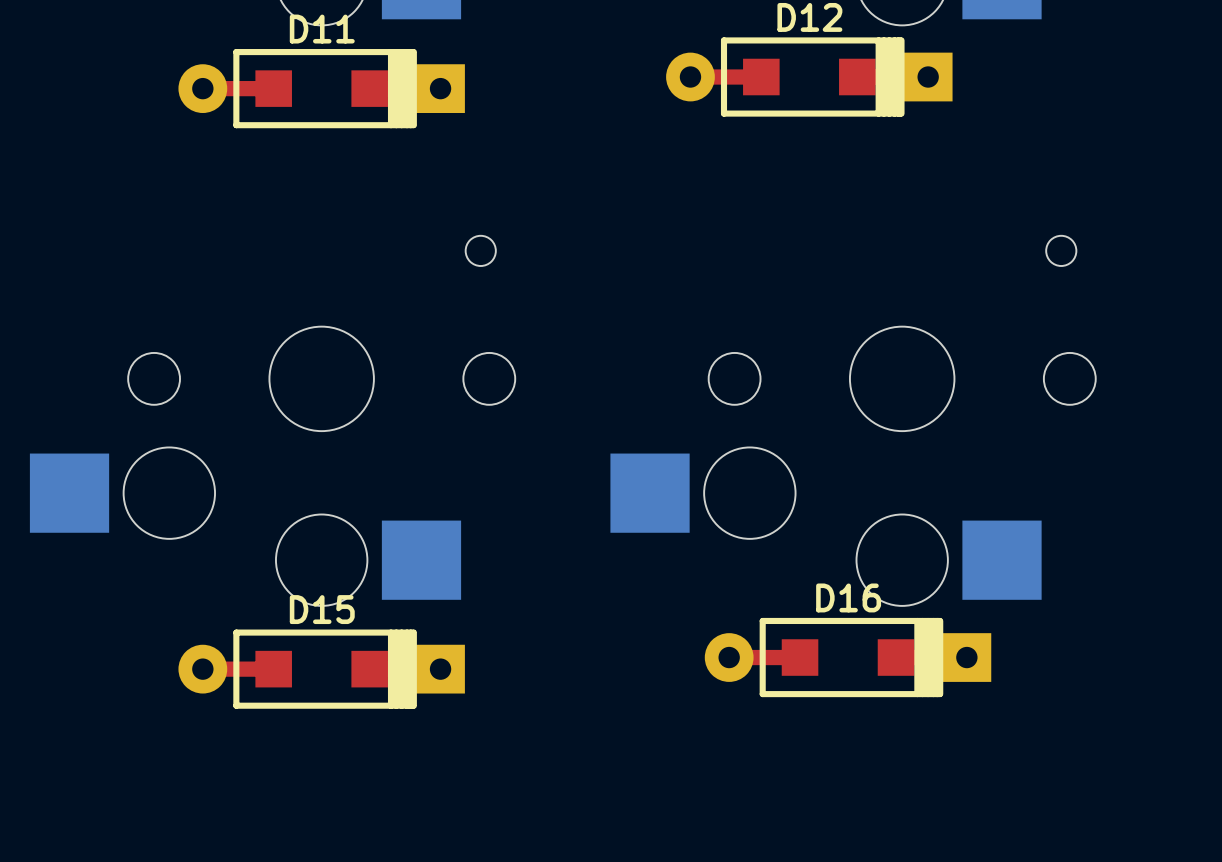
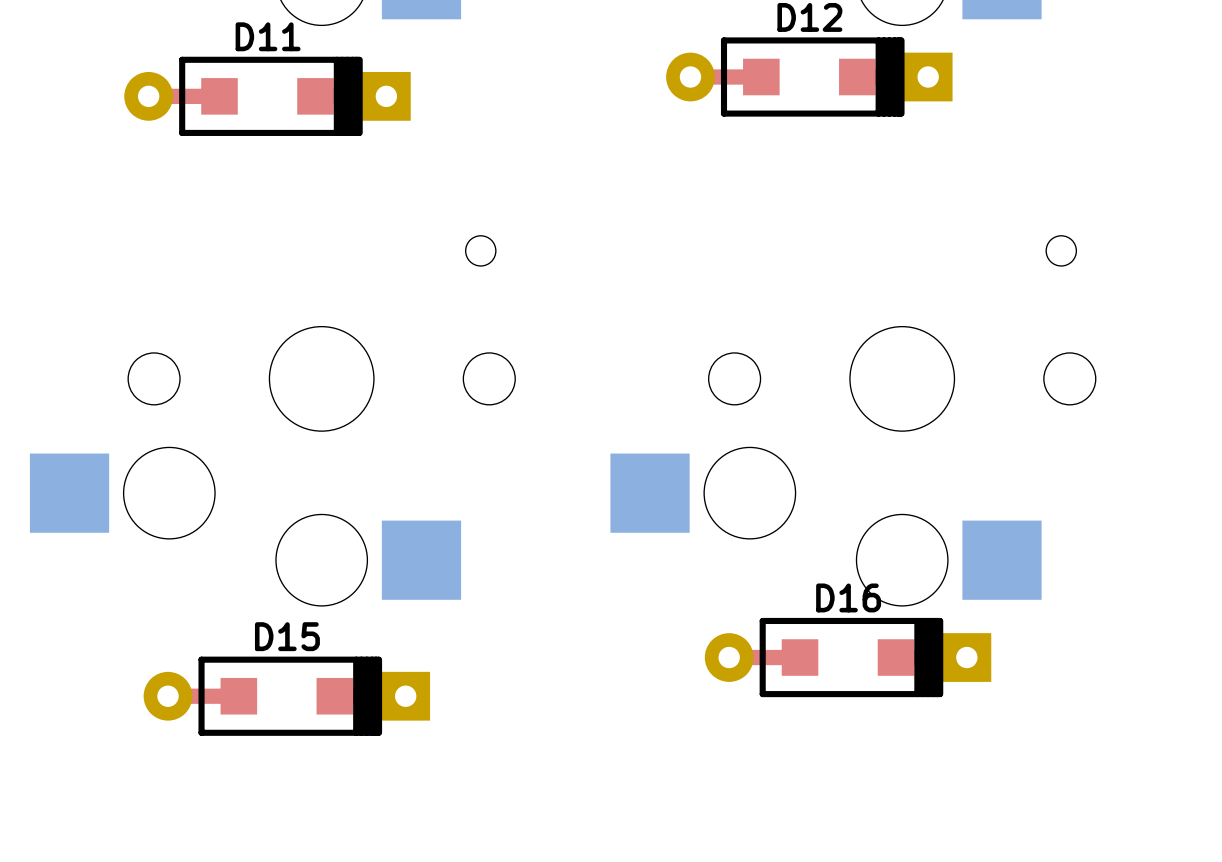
D11 position: (321, 88) -> (267, 96)
D15 position: (321, 669) -> (286, 696)

